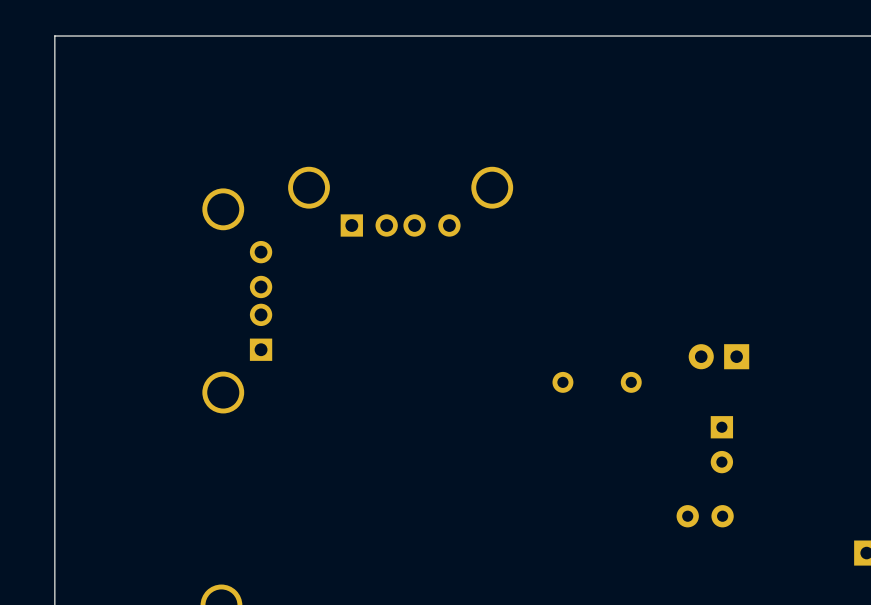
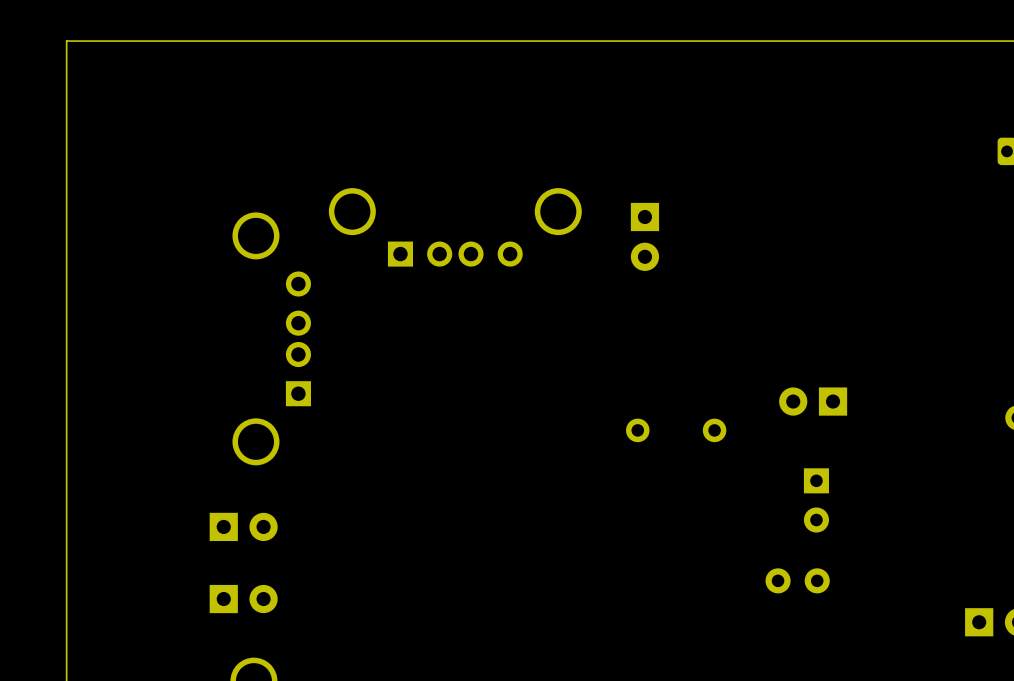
part: none -> (644, 236)
part: none -> (243, 526)
part: none -> (243, 599)

